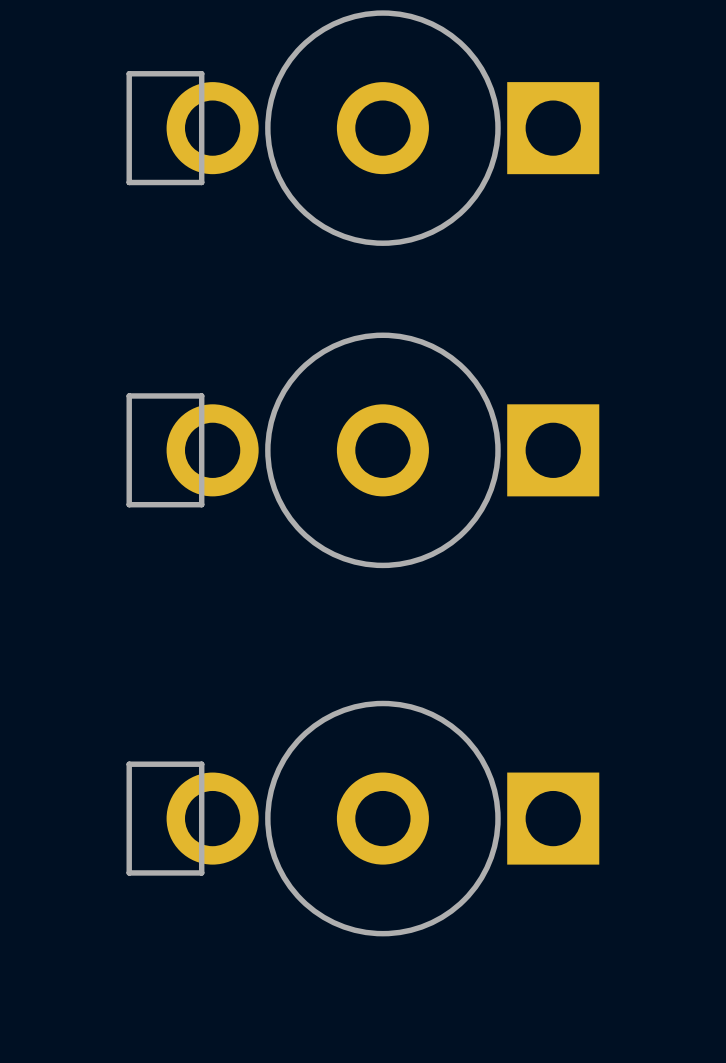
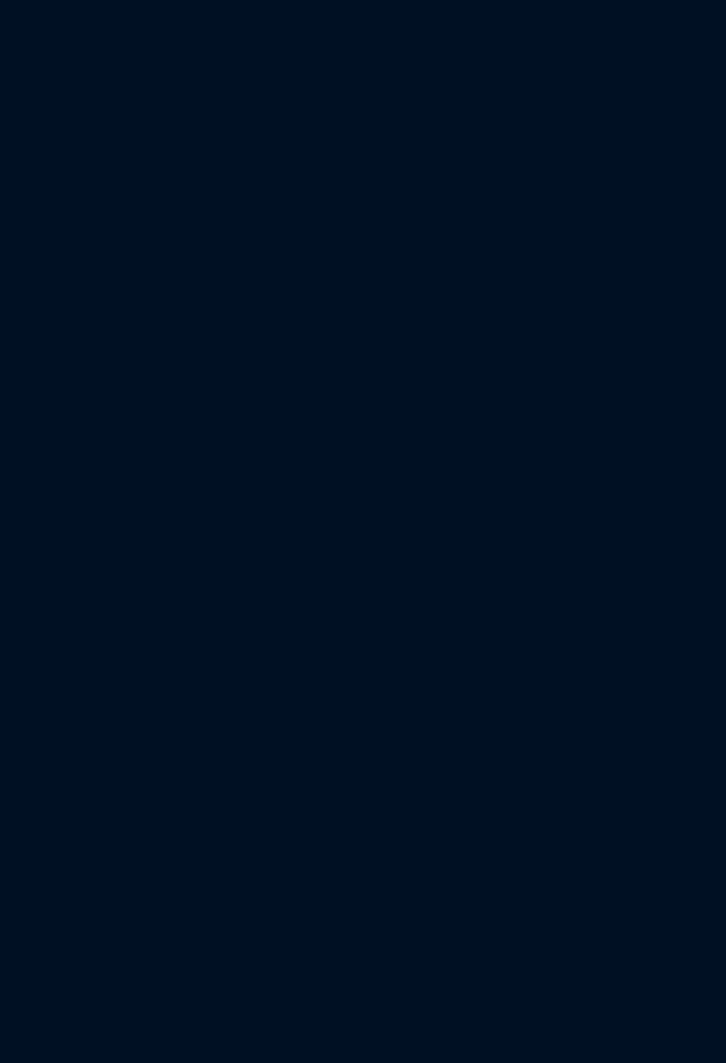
part: (362, 128) -> none
part: (362, 450) -> none
part: (362, 818) -> none

